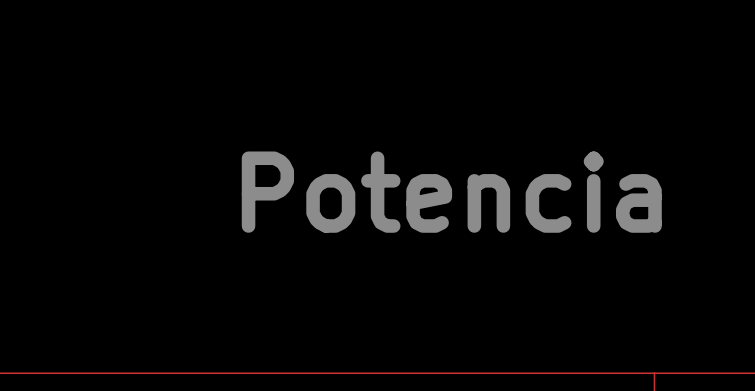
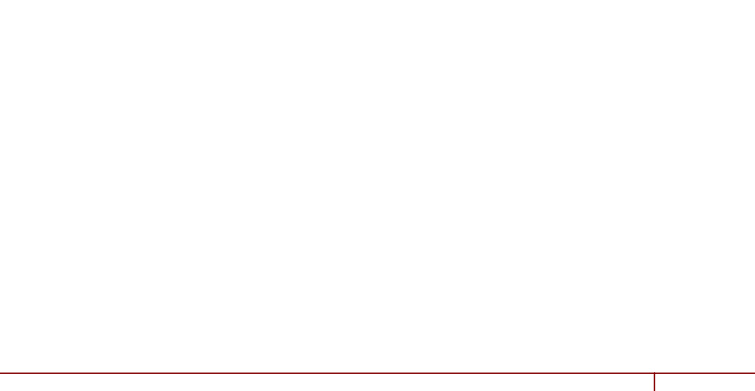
text: Potencia (451, 192) -> none

